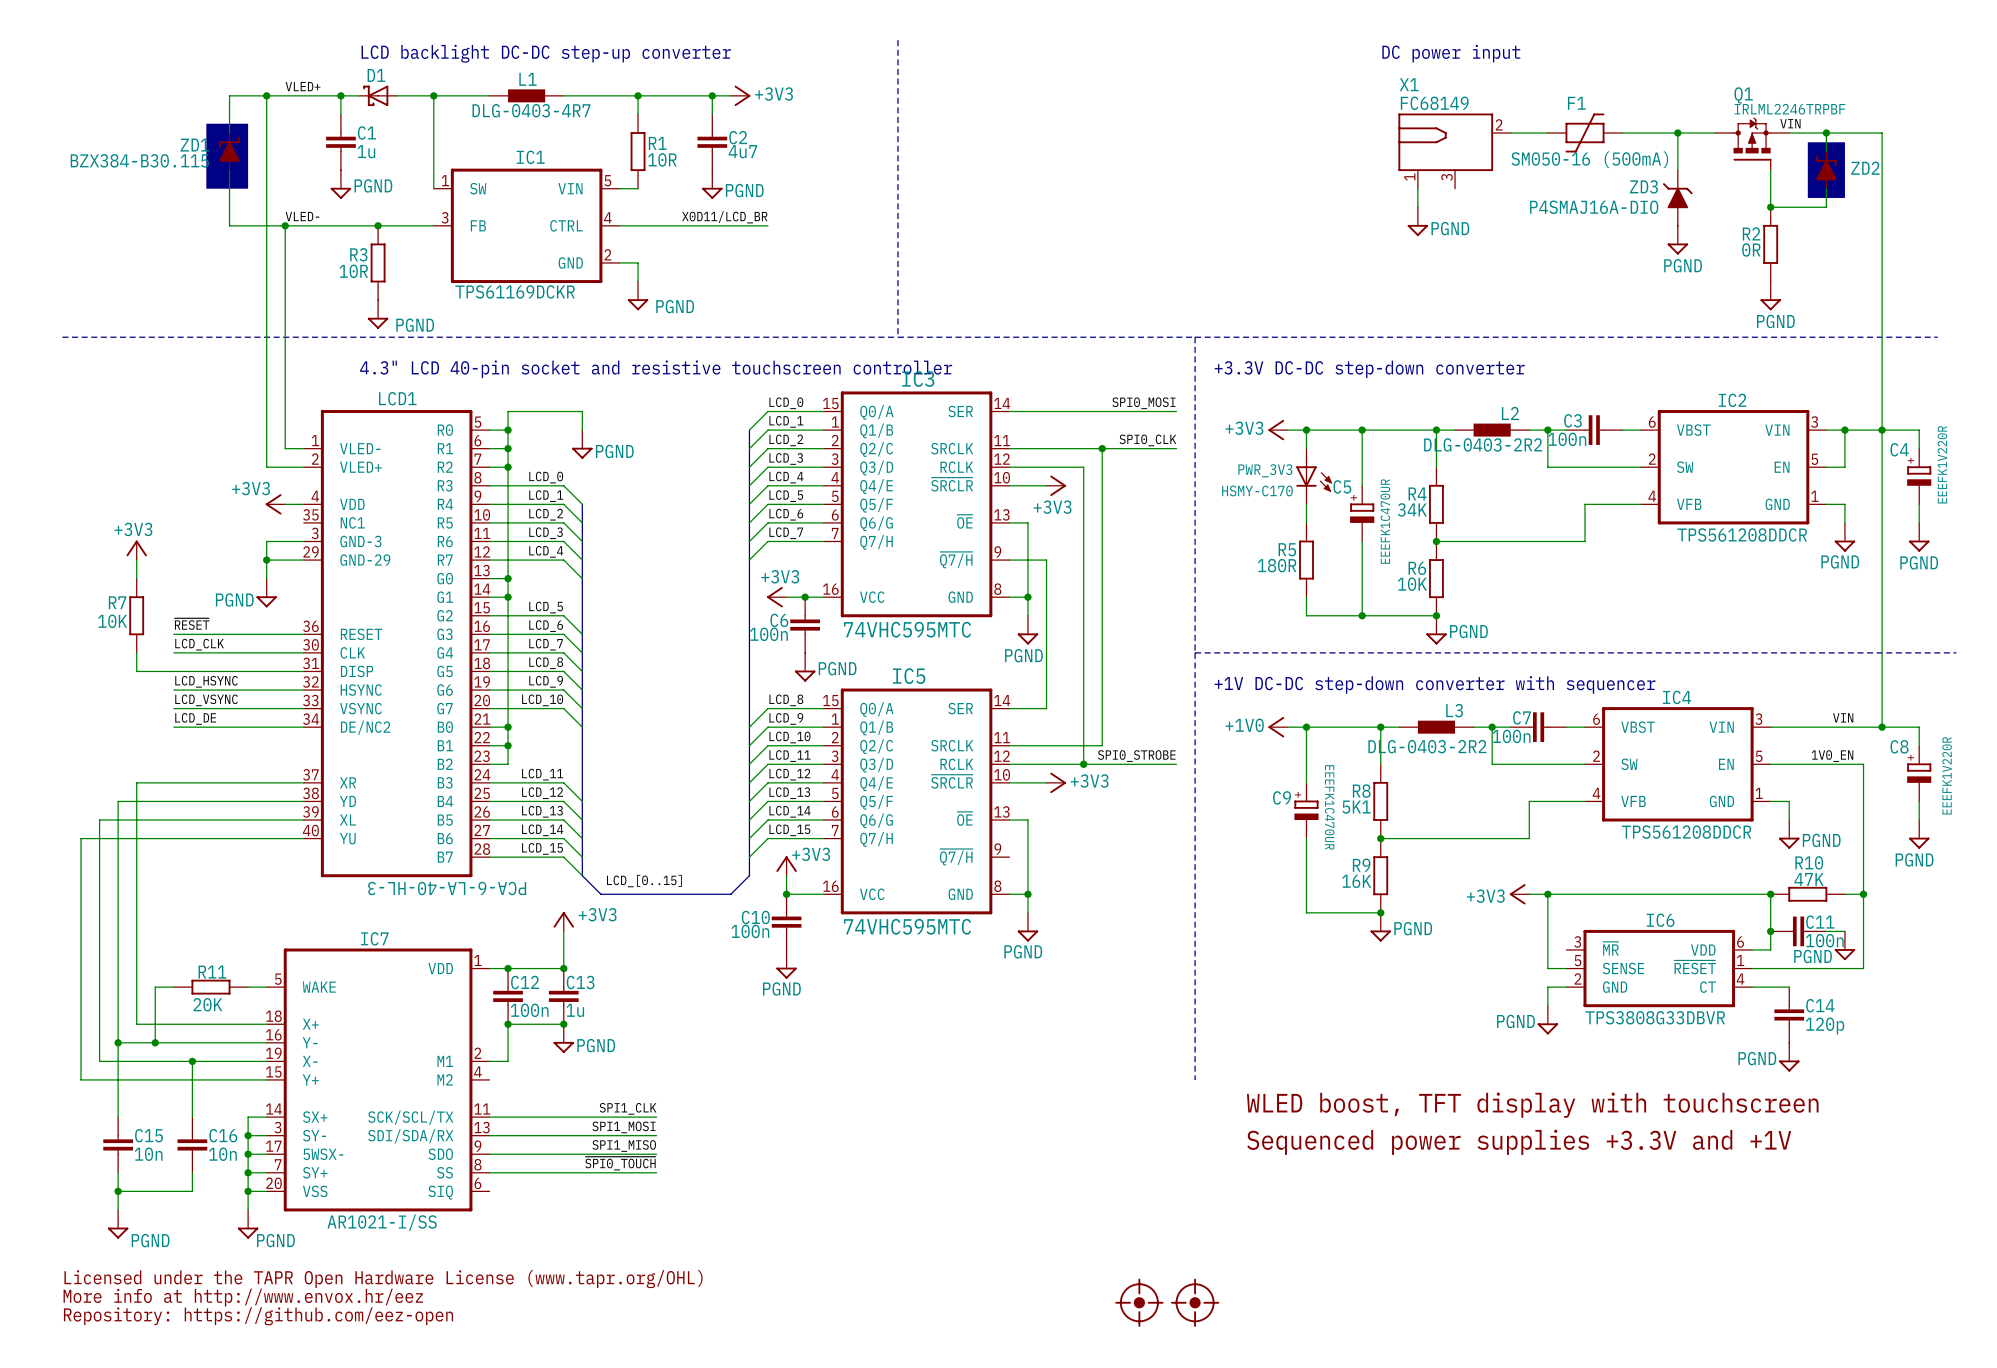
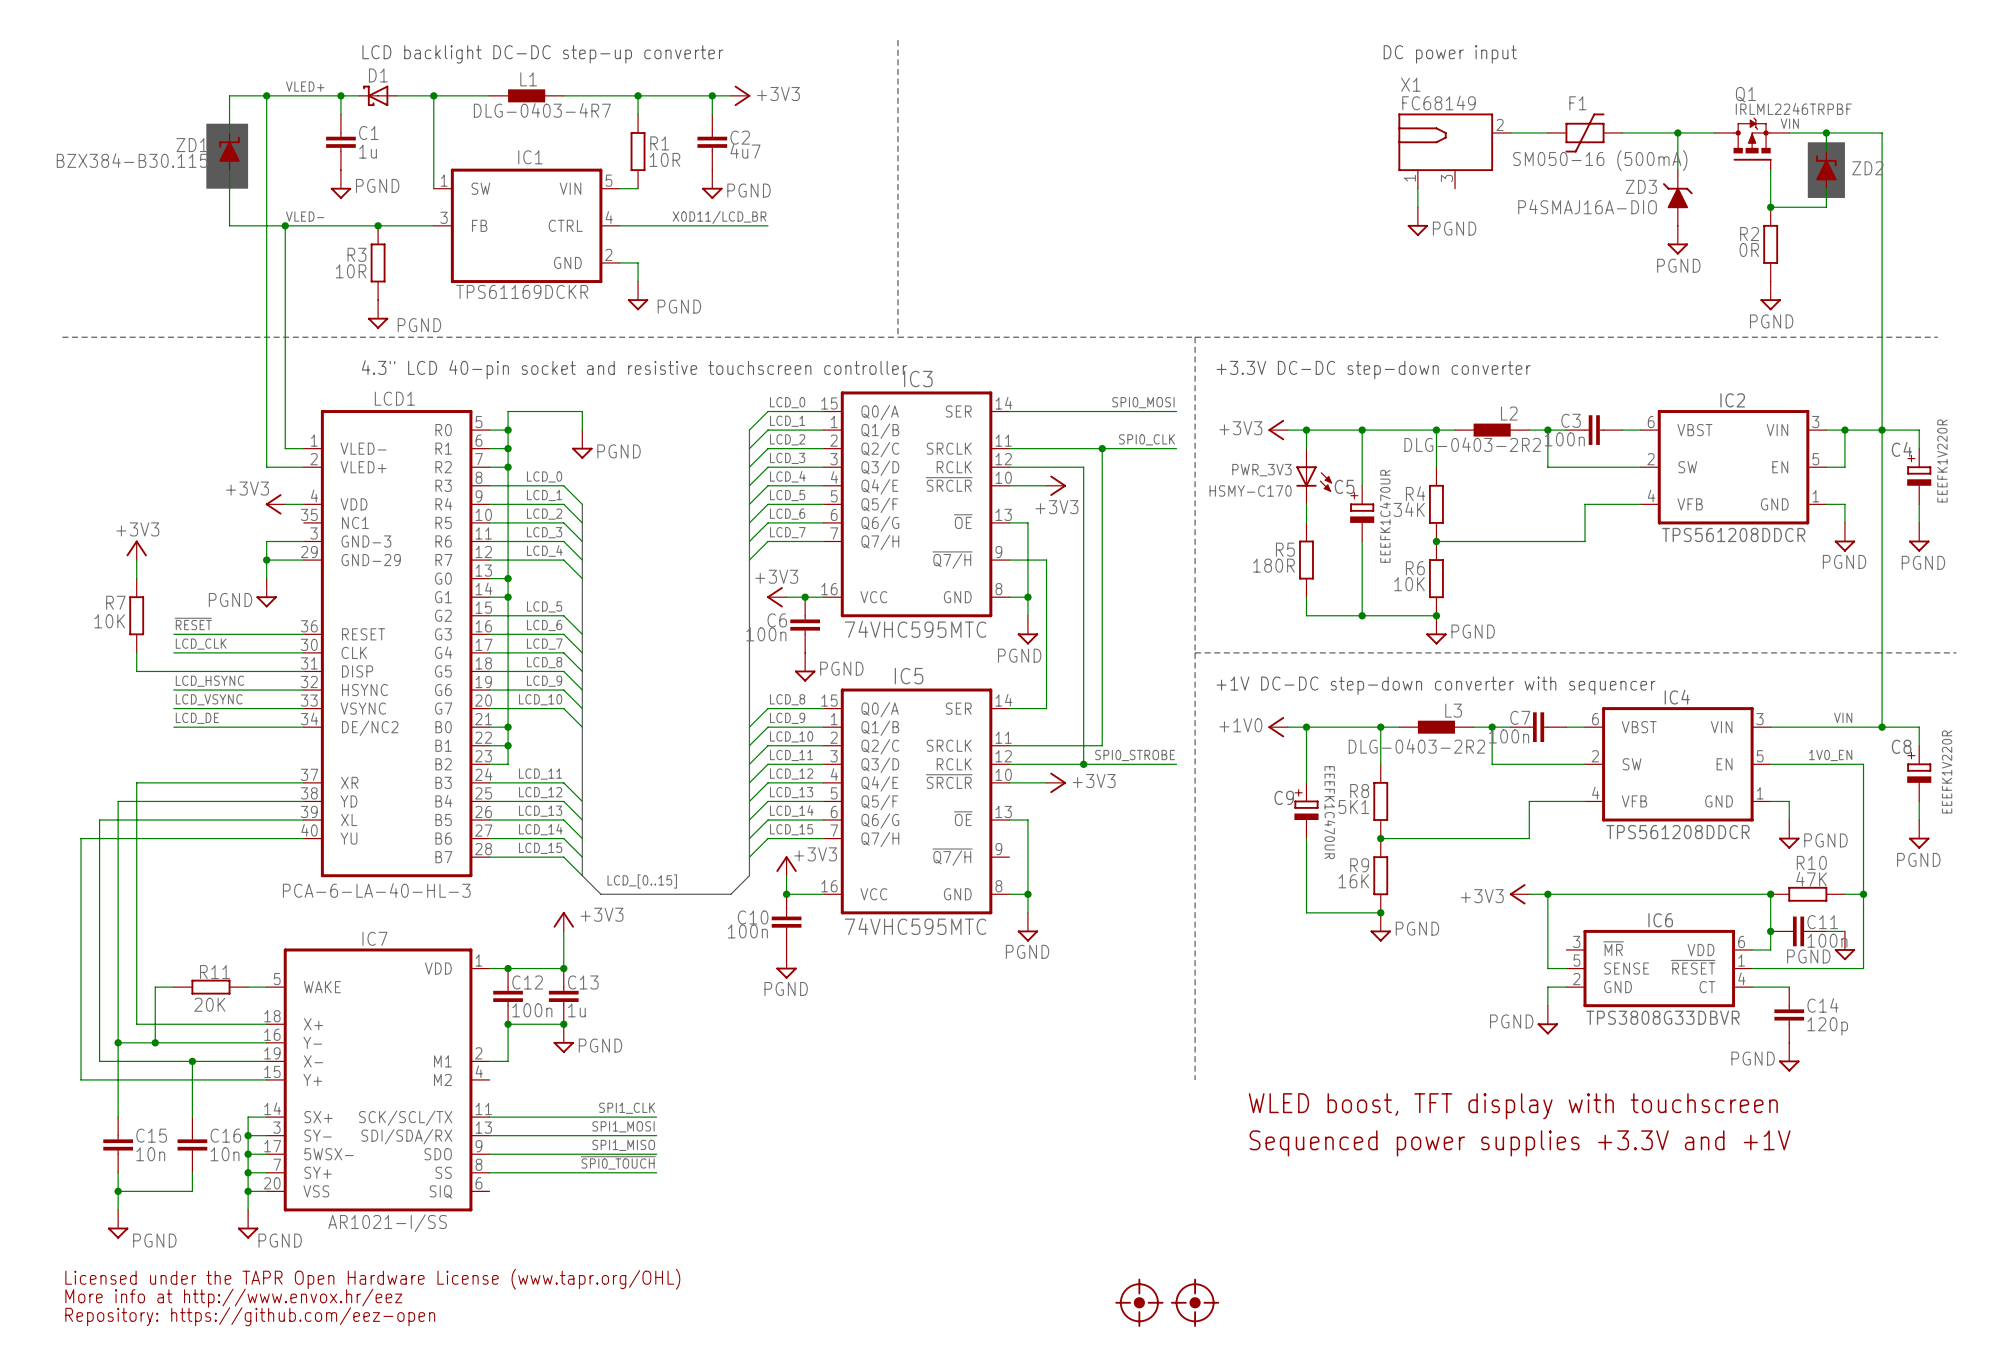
LCD1 value rotation: 0° (447, 888) -> 180° (376, 890)

